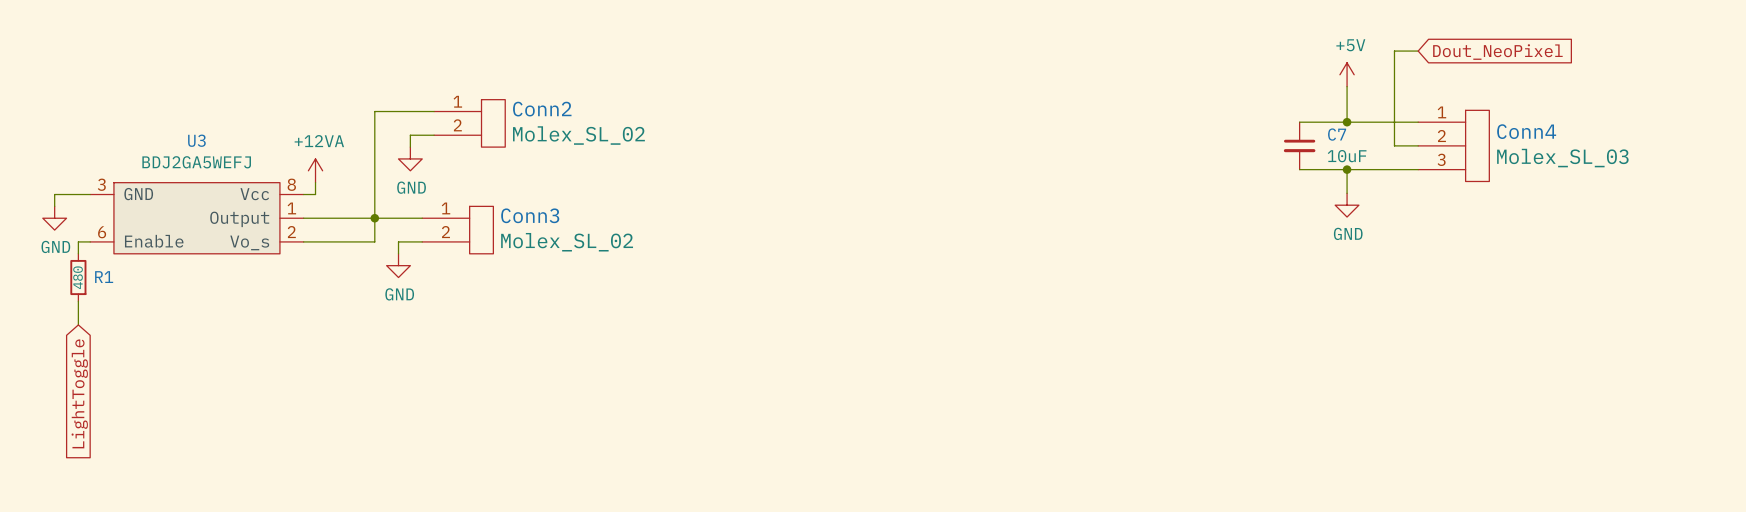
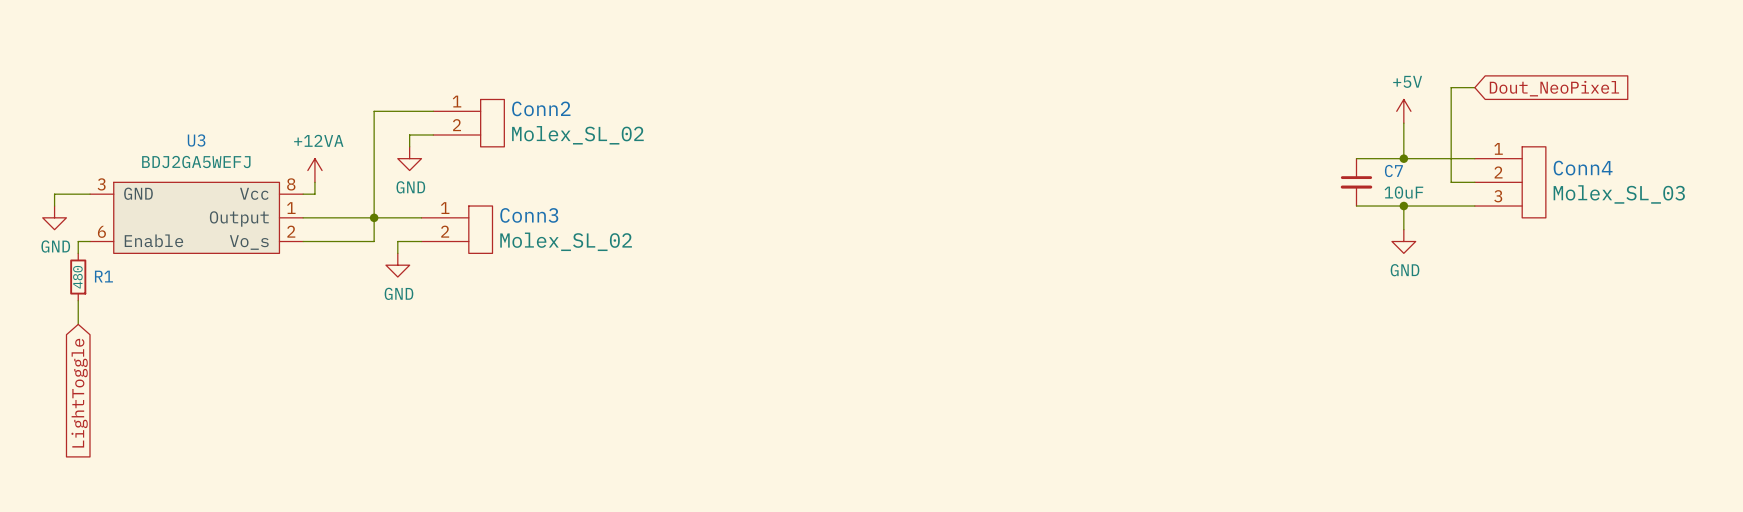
wire: (1418, 51) (1394, 51) (1394, 145) (1418, 145) -> (1474, 87) (1451, 87) (1451, 182) (1474, 182)
global label position: Dout_NeoPixel (1497, 52) -> Dout_NeoPixel (1554, 88)
power symbol position: +5V (1347, 74) -> +5V (1403, 111)
wire: (1347, 86) (1347, 122) -> (1403, 123) (1403, 158)
wire: (1299, 122) (1418, 122) -> (1356, 158) (1474, 158)
junction: (1347, 122) -> none
C7 position: (1299, 145) -> (1356, 182)
Conn4 position: (1453, 145) -> (1510, 182)
junction: none -> (1403, 158)
wire: (1299, 169) (1418, 169) -> (1356, 206) (1474, 206)
wire: (1347, 169) (1347, 193) -> (1403, 206) (1403, 229)
junction: (1347, 169) -> none
power symbol position: GND (1347, 205) -> GND (1403, 241)
junction: none -> (1403, 206)

